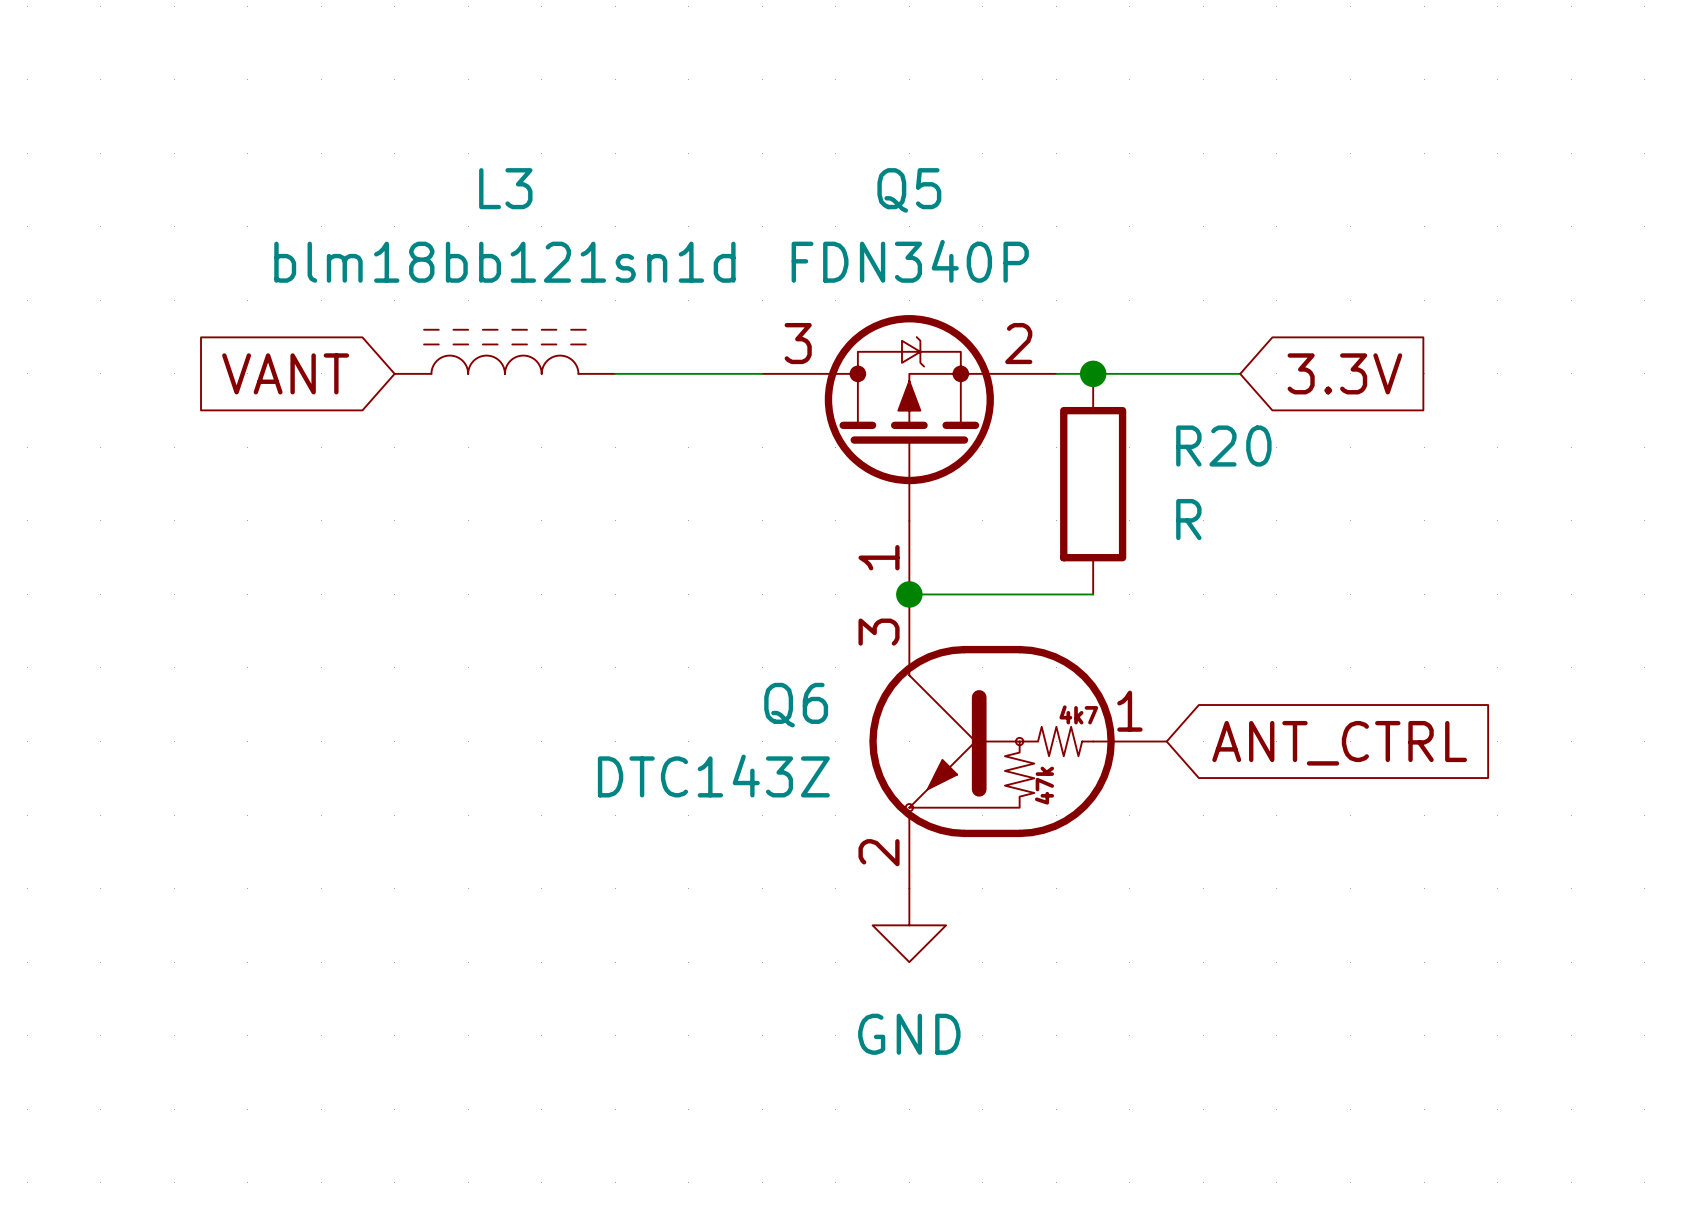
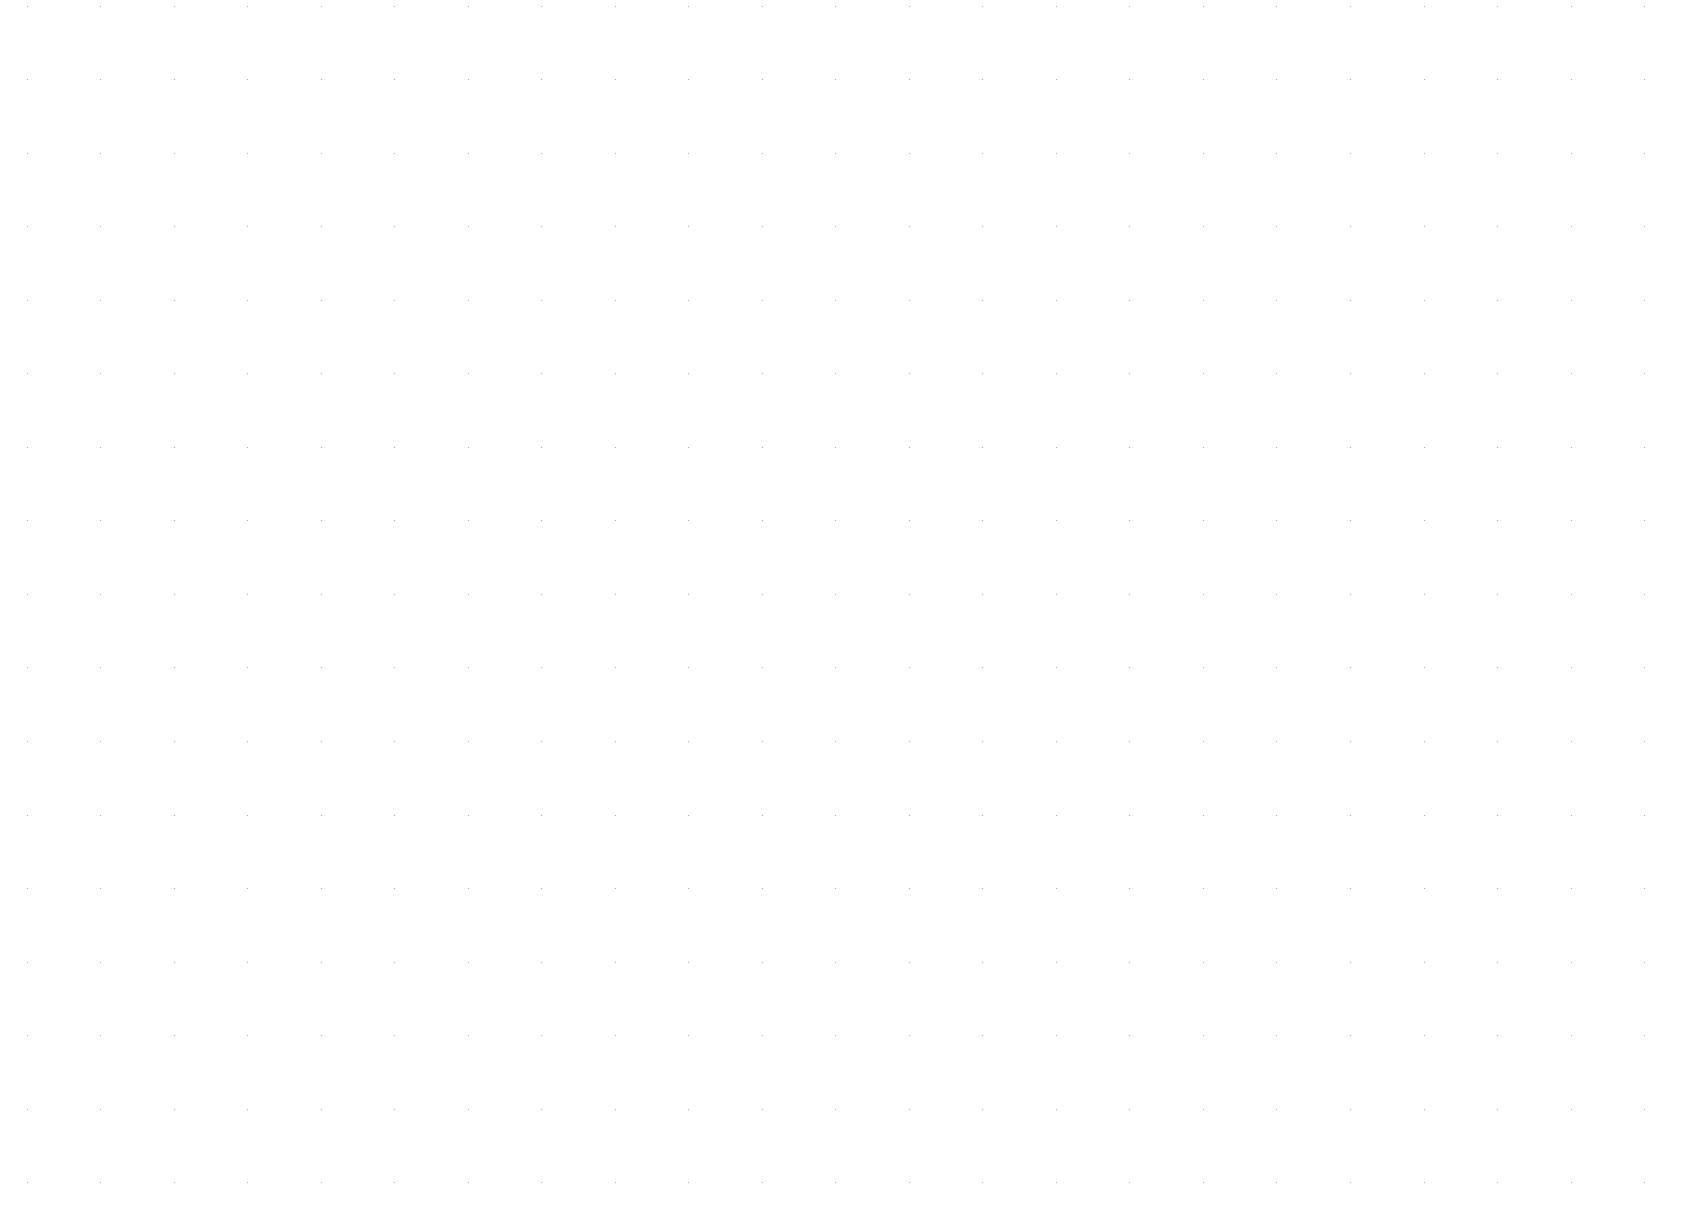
L3: blm18bb121sn1d (504, 351) -> none
global label: VANT (285, 373) -> none
wire: (615, 373) (762, 373) -> none
wire: (1056, 373) (1240, 373) -> none
junction: (1093, 373) -> none
global label: 3.3V (1344, 373) -> none
Q5: FDN340P (909, 454) -> none
R20: R (1093, 484) -> none
wire: (909, 594) (1093, 594) -> none
junction: (909, 594) -> none
Q6: DTC143Z (1018, 741) -> none
global label: ANT_CTRL (1339, 743) -> none
power symbol: GND (909, 925) -> none

